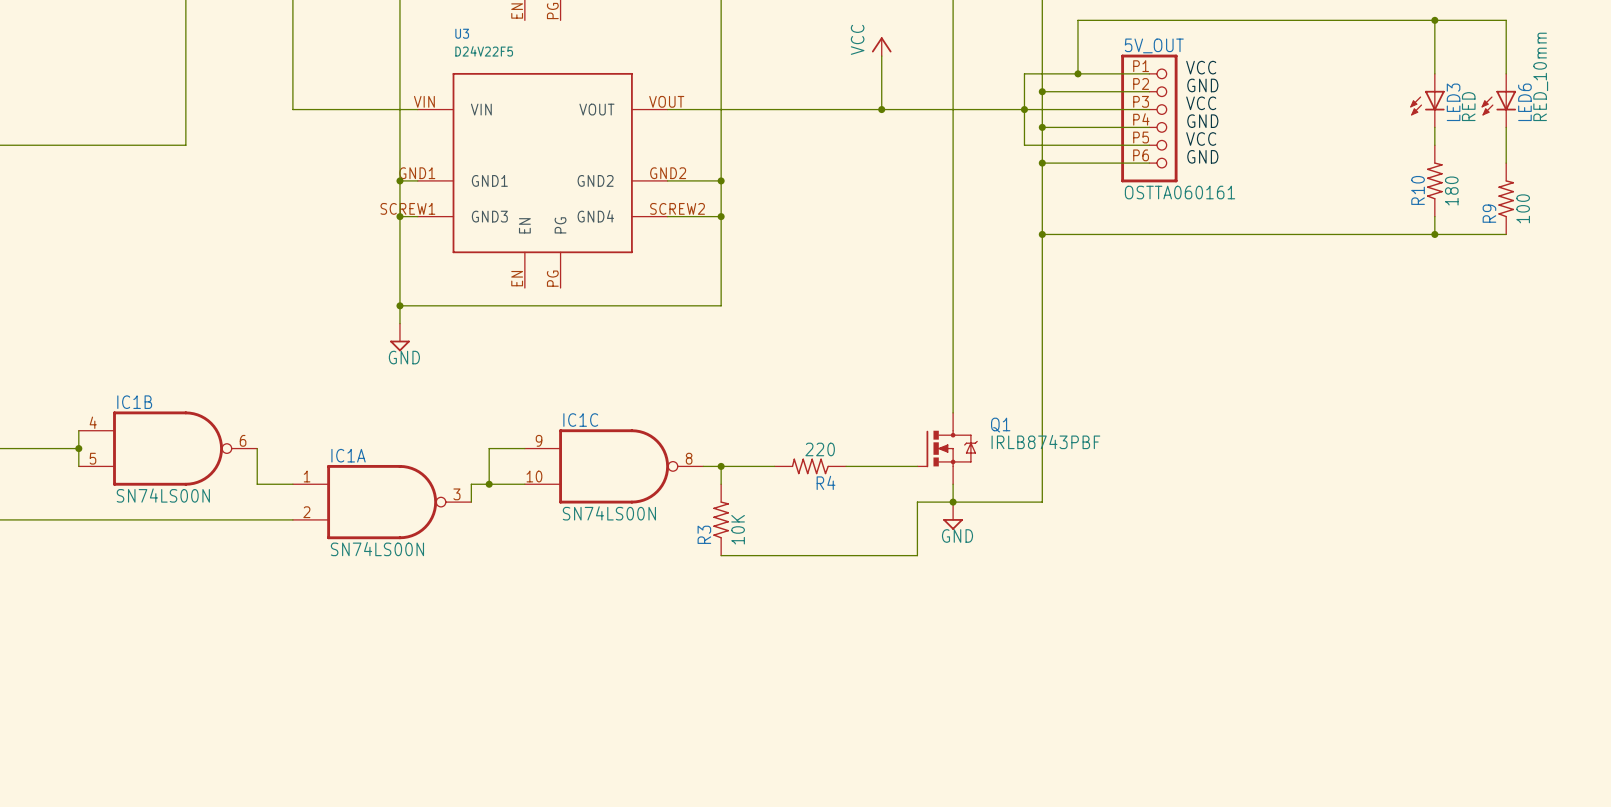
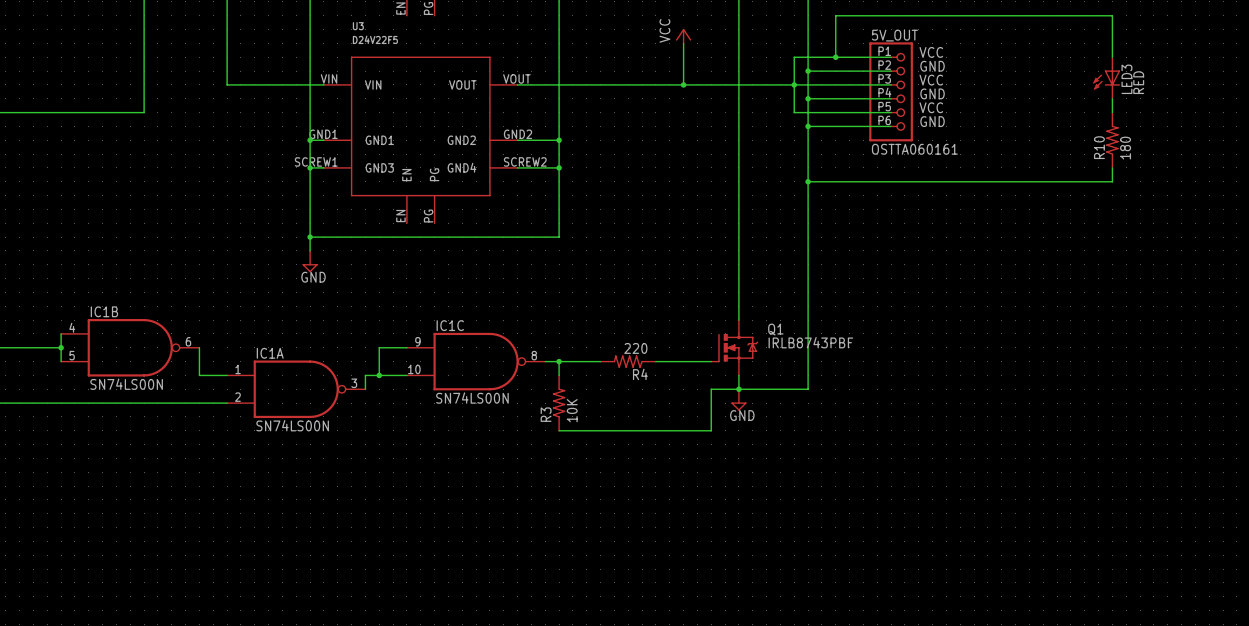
wire: (1434, 20) (1506, 20) (1506, 73) -> none
junction: (1434, 20) -> none
LED6: RED_10mm (1498, 100) -> none
wire: (1506, 127) (1506, 163) -> none
R9: 100 (1506, 198) -> none
wire: (1434, 234) (1506, 234) -> none
junction: (1434, 234) -> none

